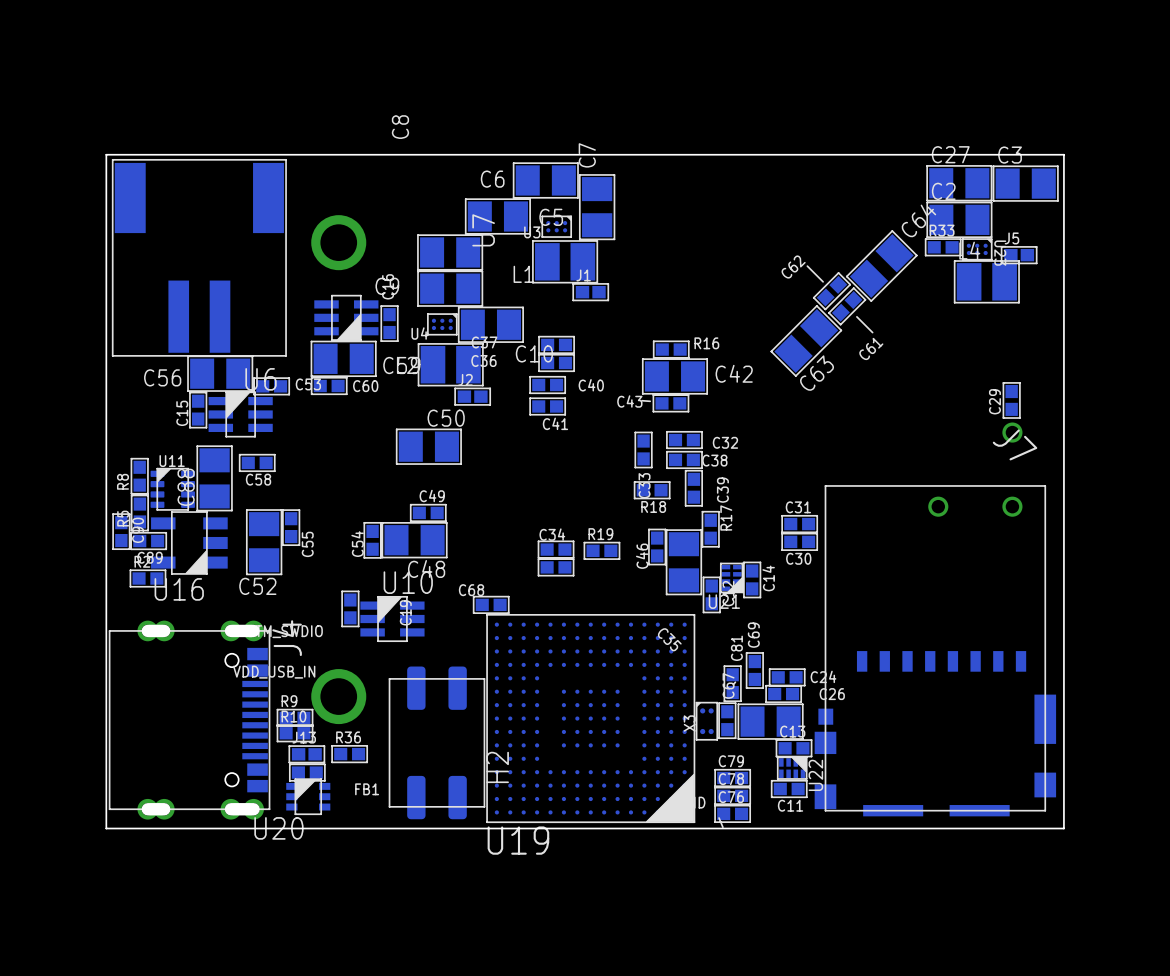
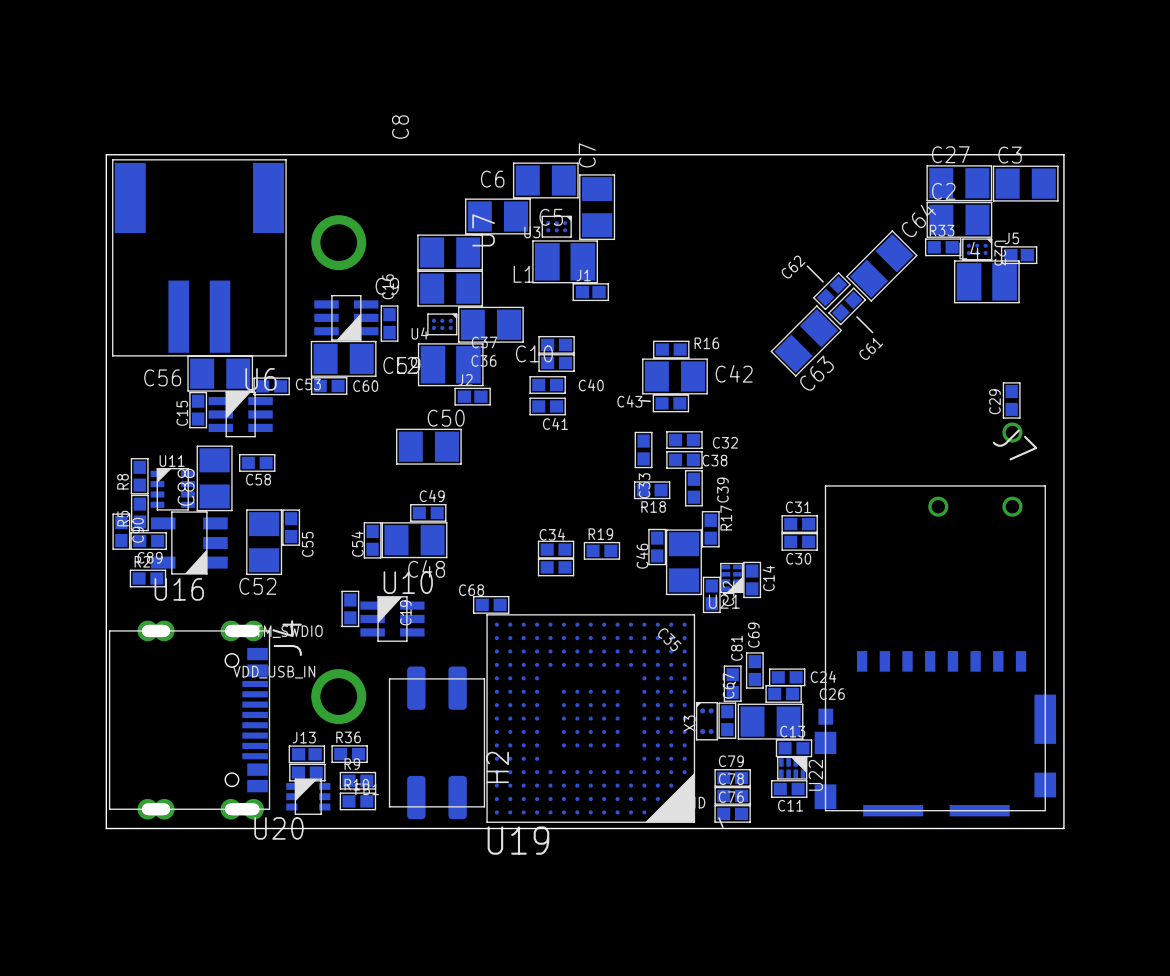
R9 position: (295, 717) -> (357, 780)
R10 position: (295, 733) -> (357, 801)

